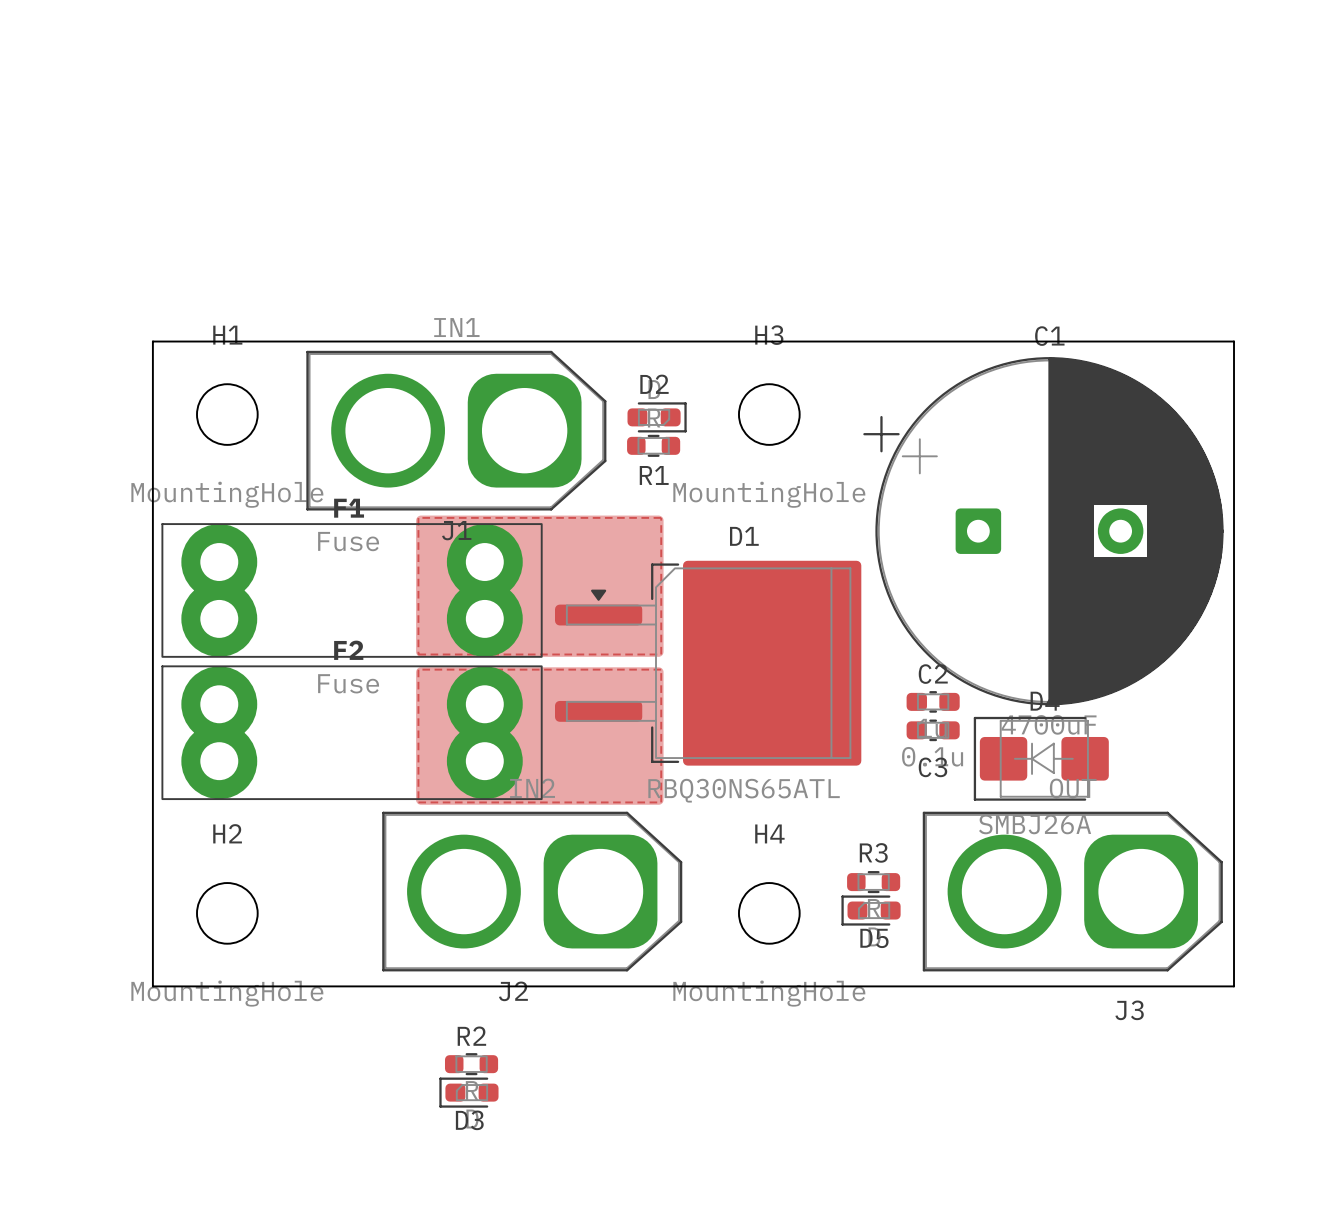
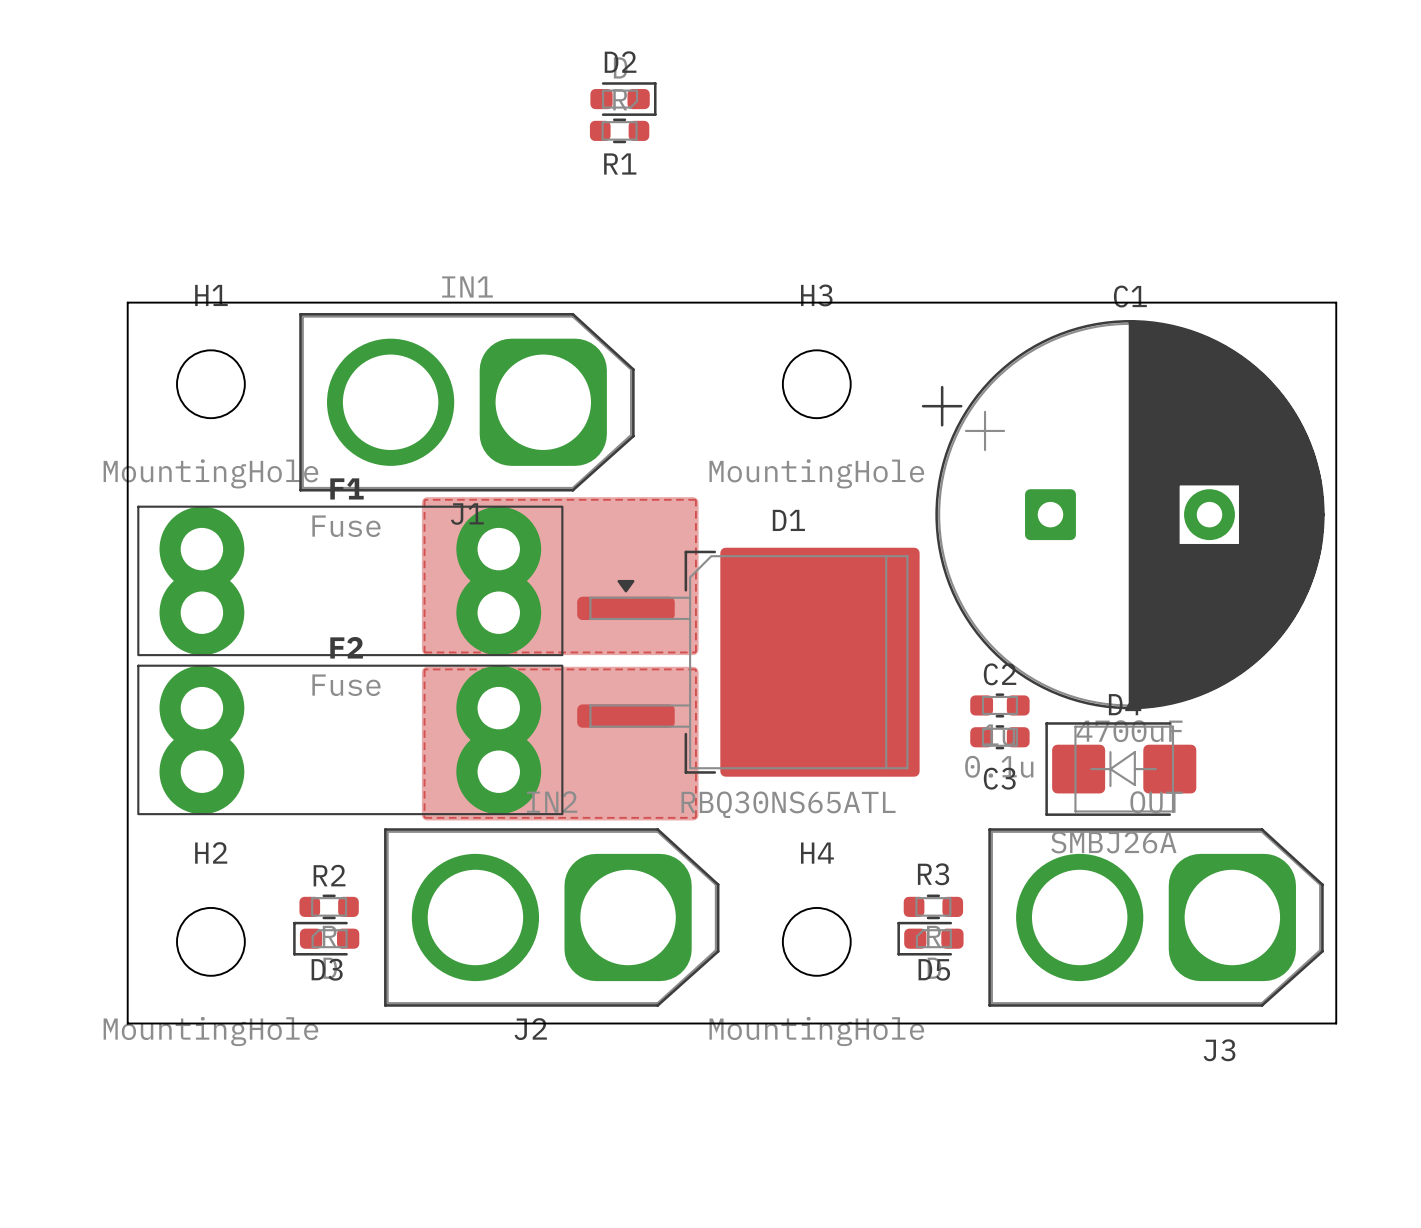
D2 position: (657, 417) -> (623, 99)
R1 position: (653, 445) -> (619, 130)
R2 position: (471, 1064) -> (329, 906)
D3 position: (468, 1092) -> (326, 938)

